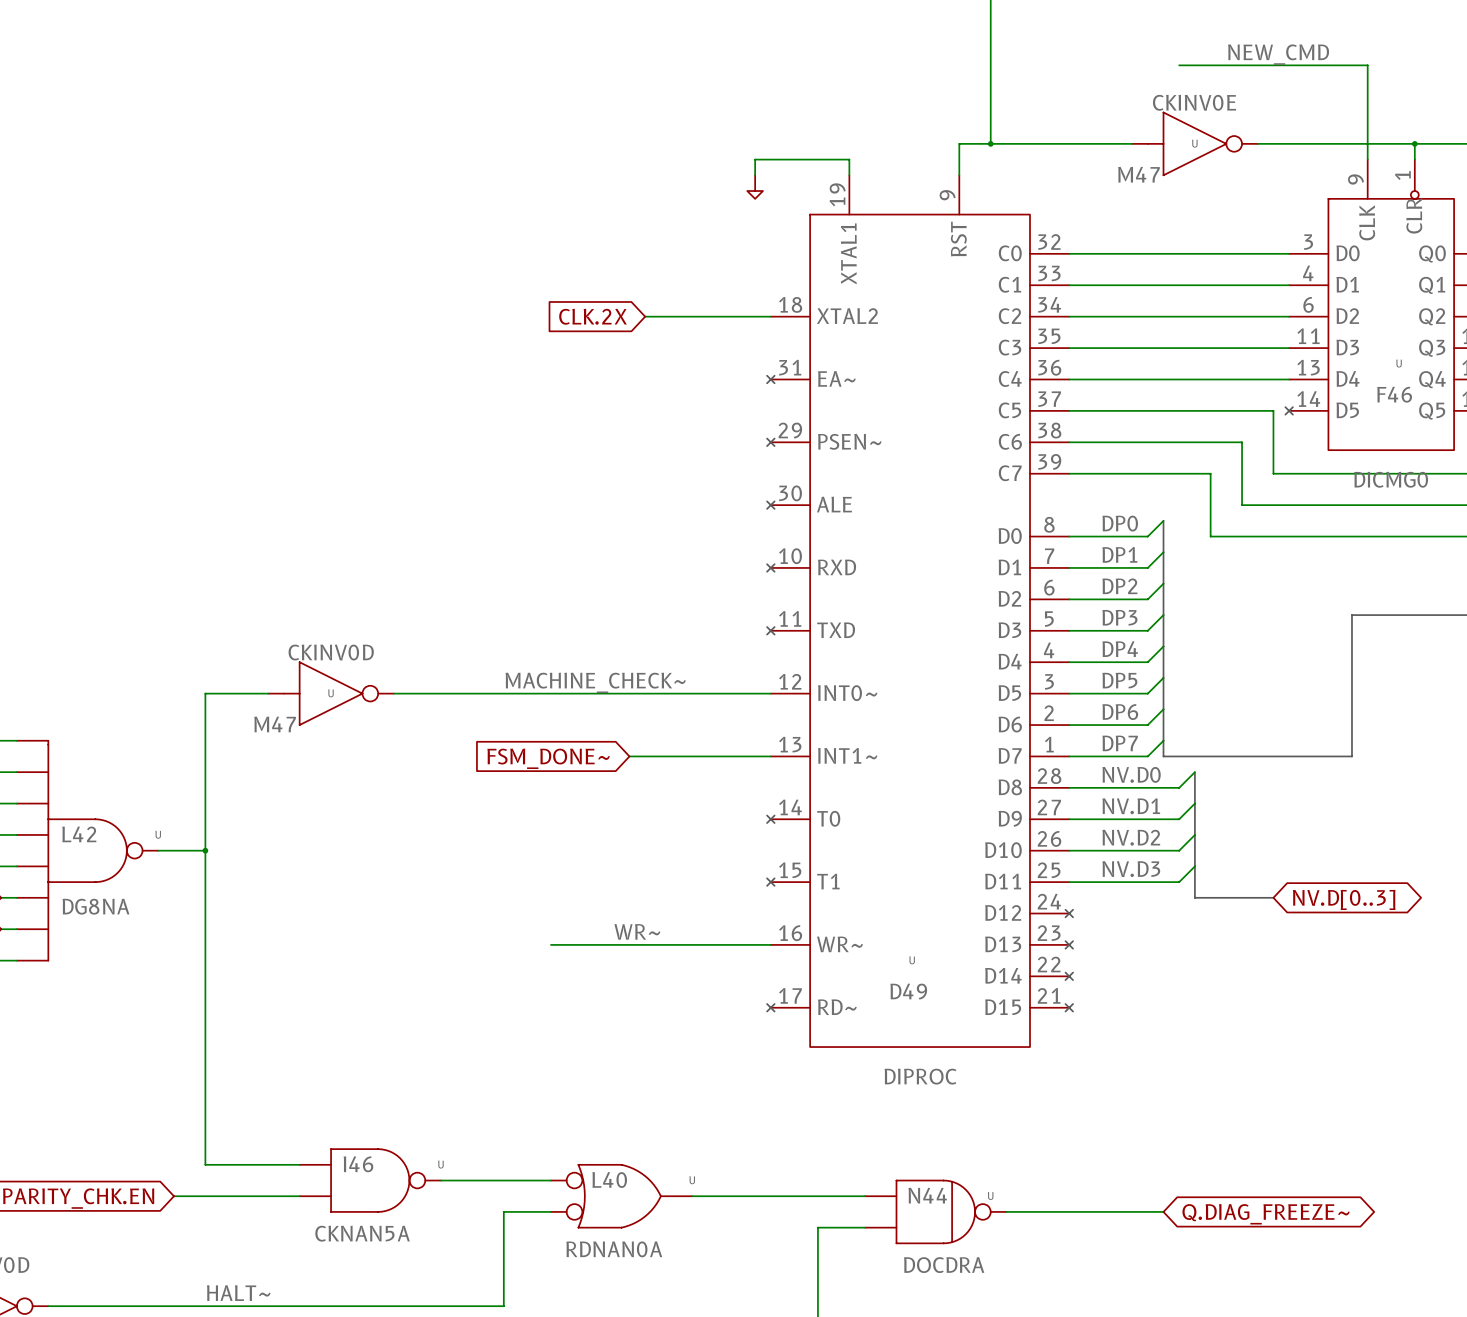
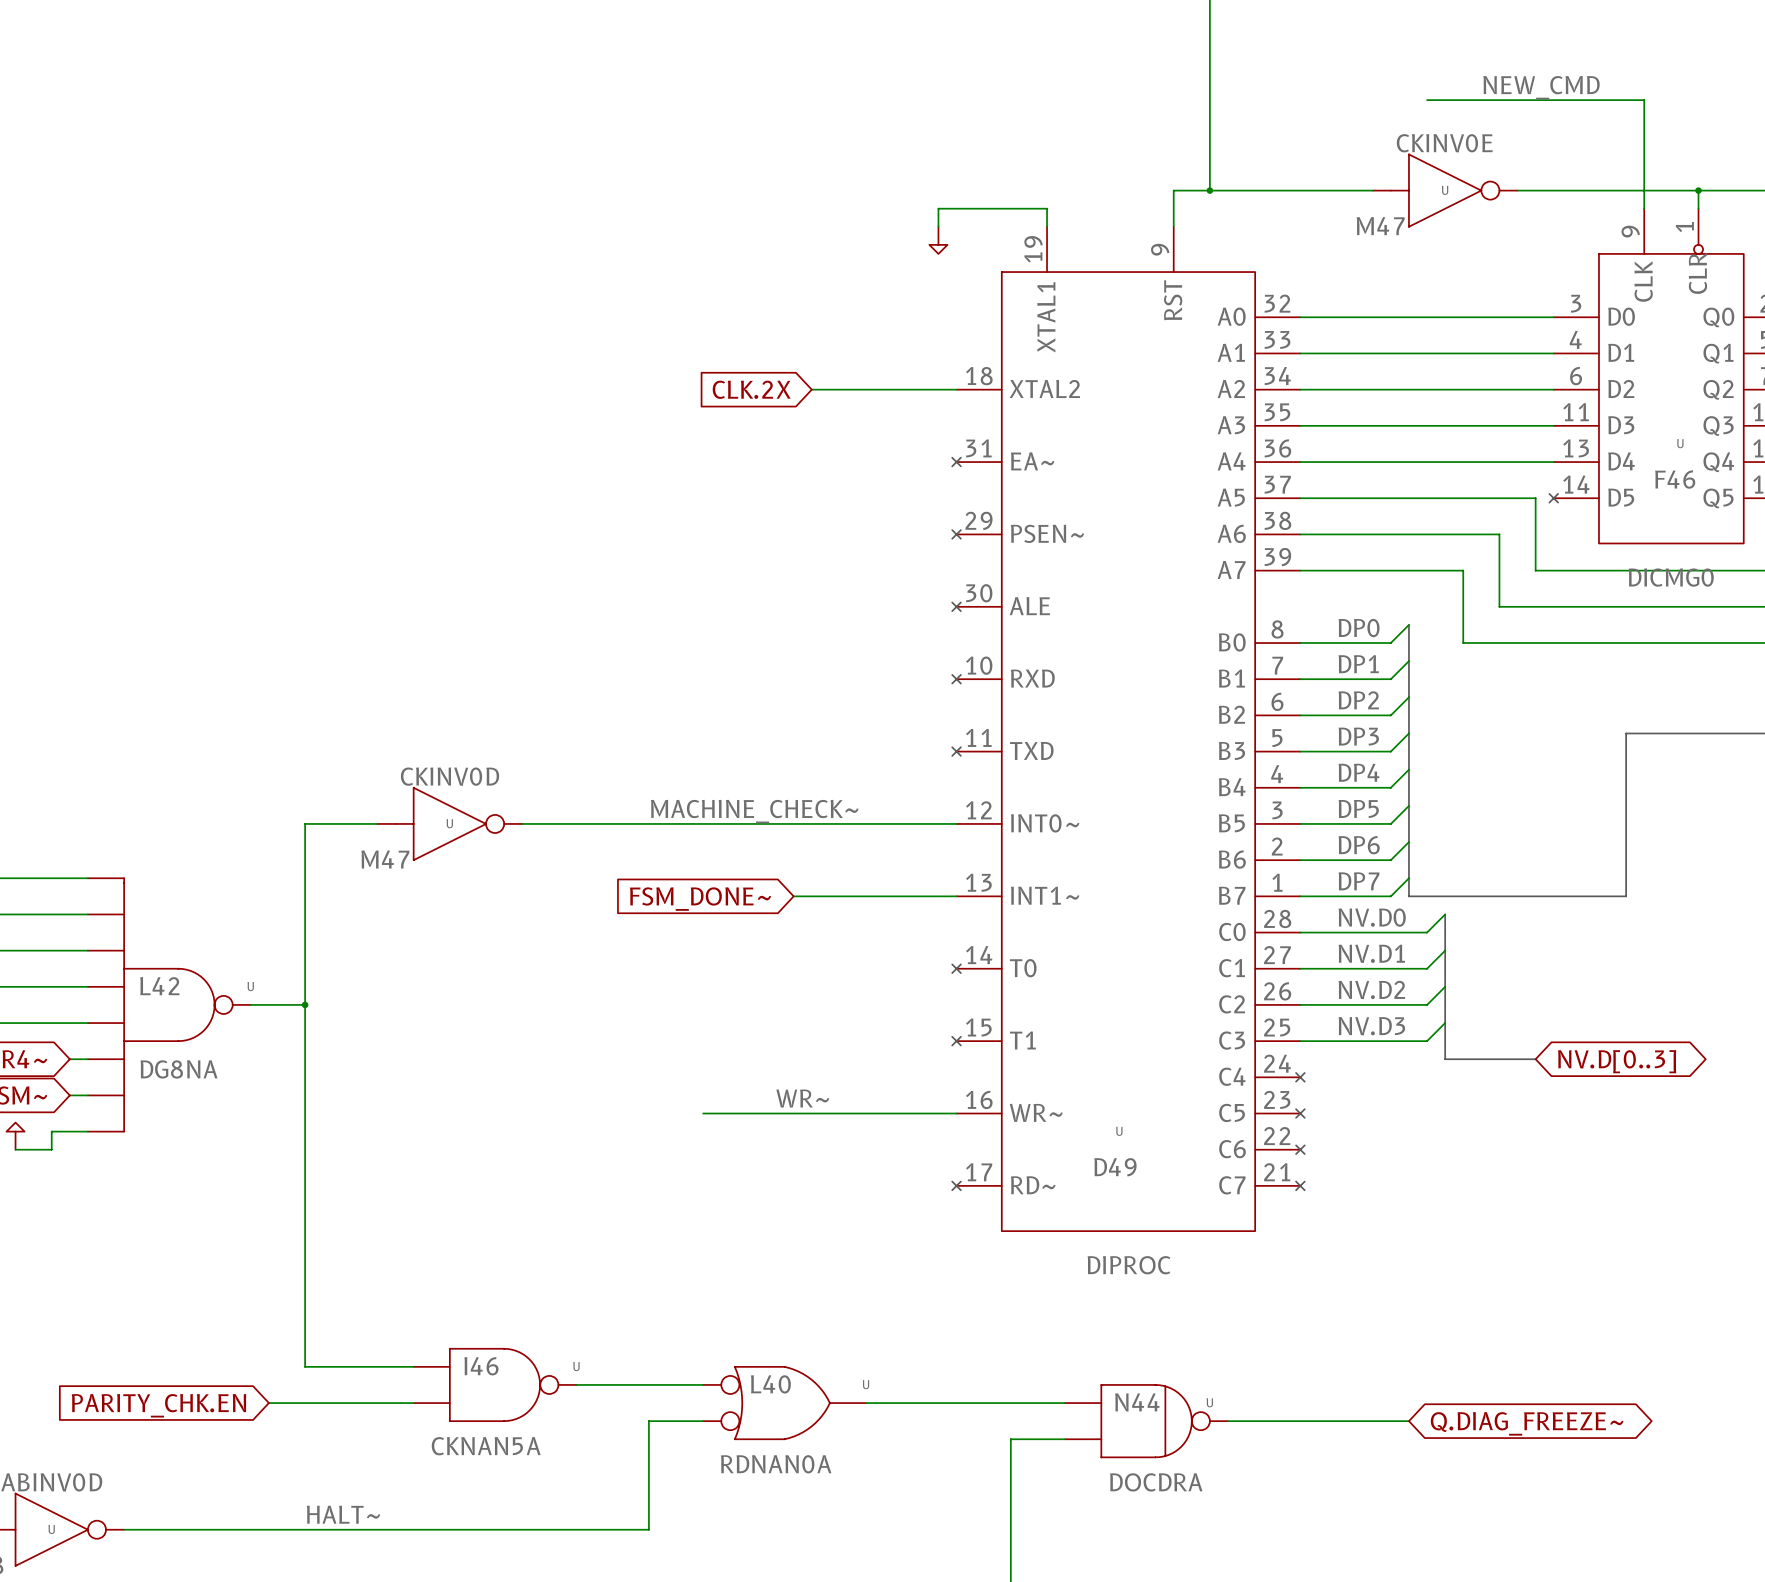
U symbol: [770, 175, 1070, 1048] -> [956, 226, 1301, 1232]

